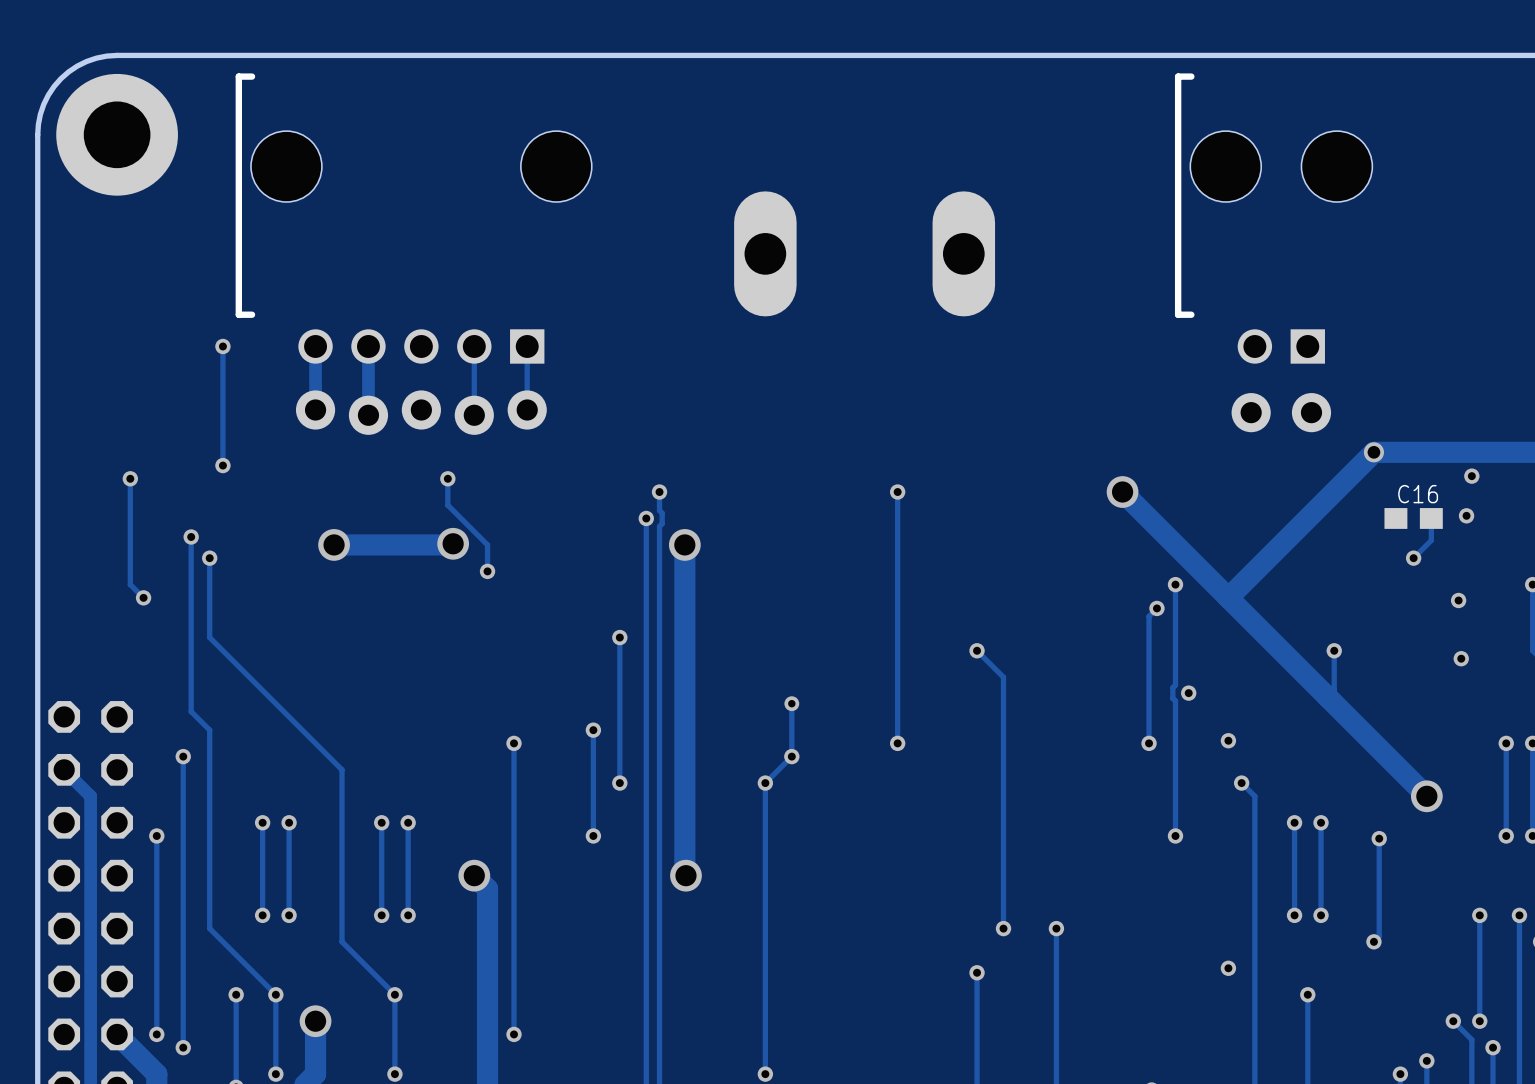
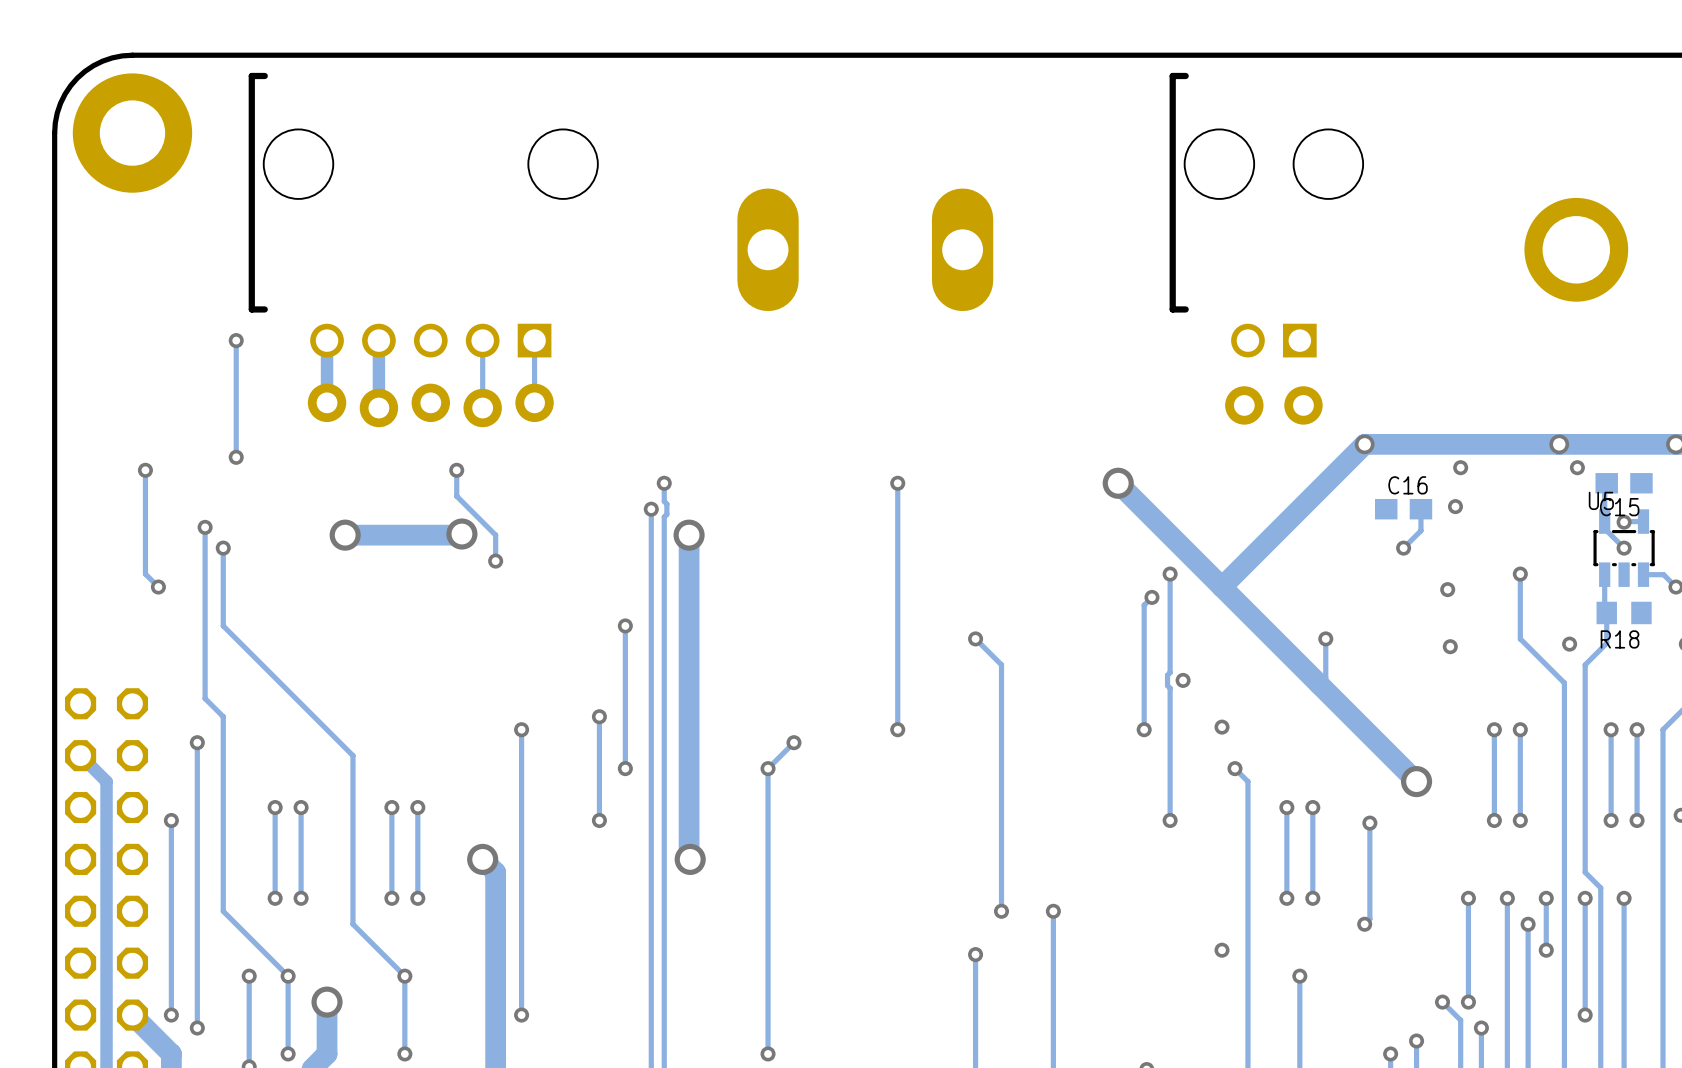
track: (791, 703) (791, 756) -> none
via: (791, 703) -> none

